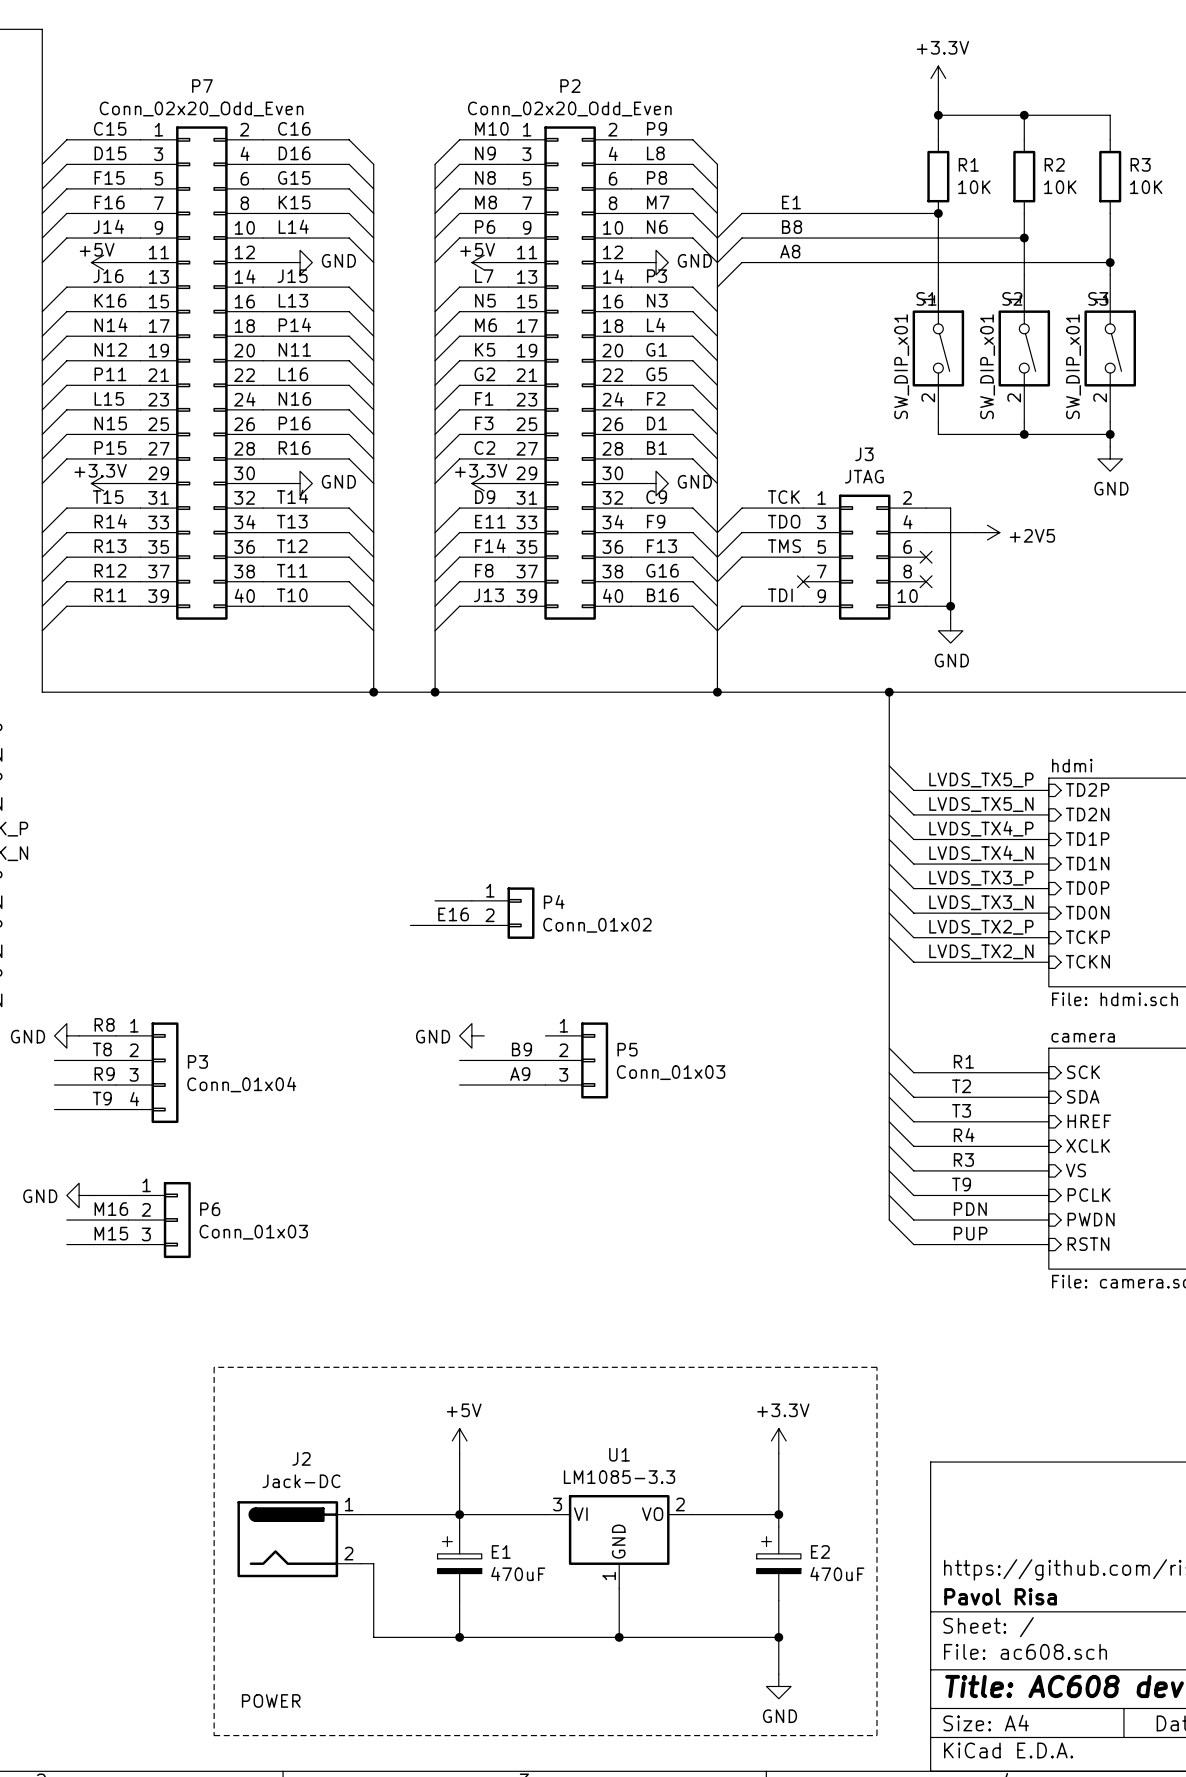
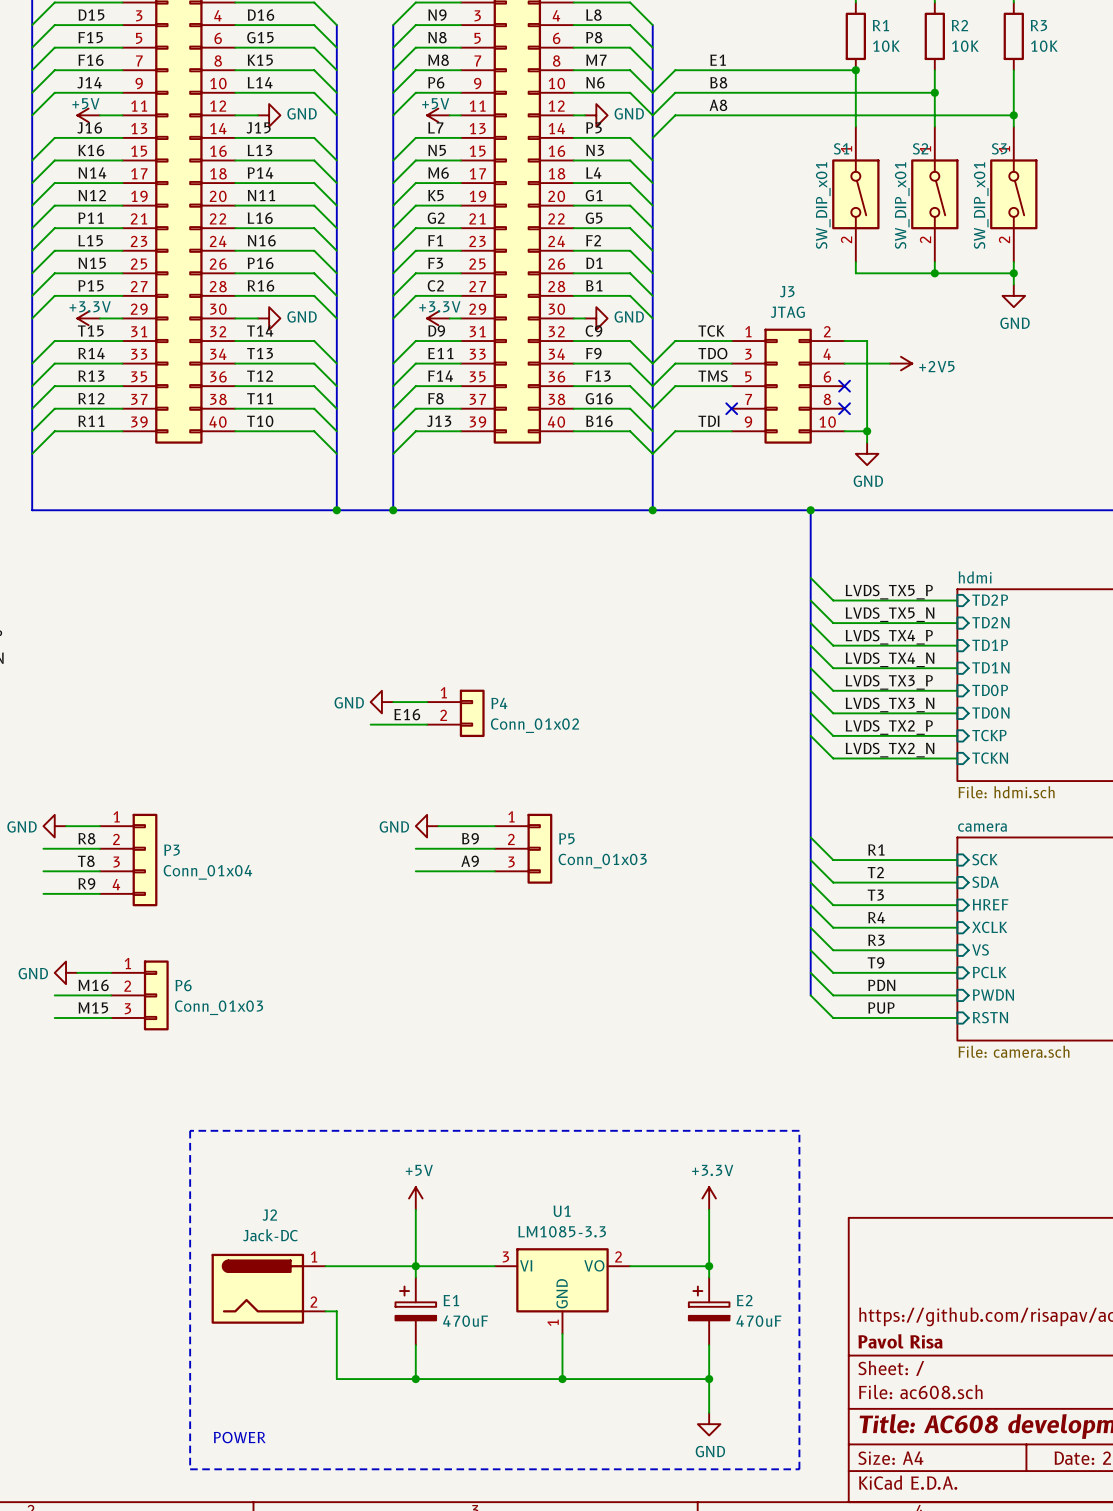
power symbol: none -> GND (381, 702)
label: R8 (104, 1024) -> none
wire: none -> (438, 826) (494, 826)
label: T8 (102, 1049) -> R8 (86, 838)
label: R9 (104, 1074) -> T8 (86, 861)
label: T9 (102, 1098) -> R9 (86, 883)

